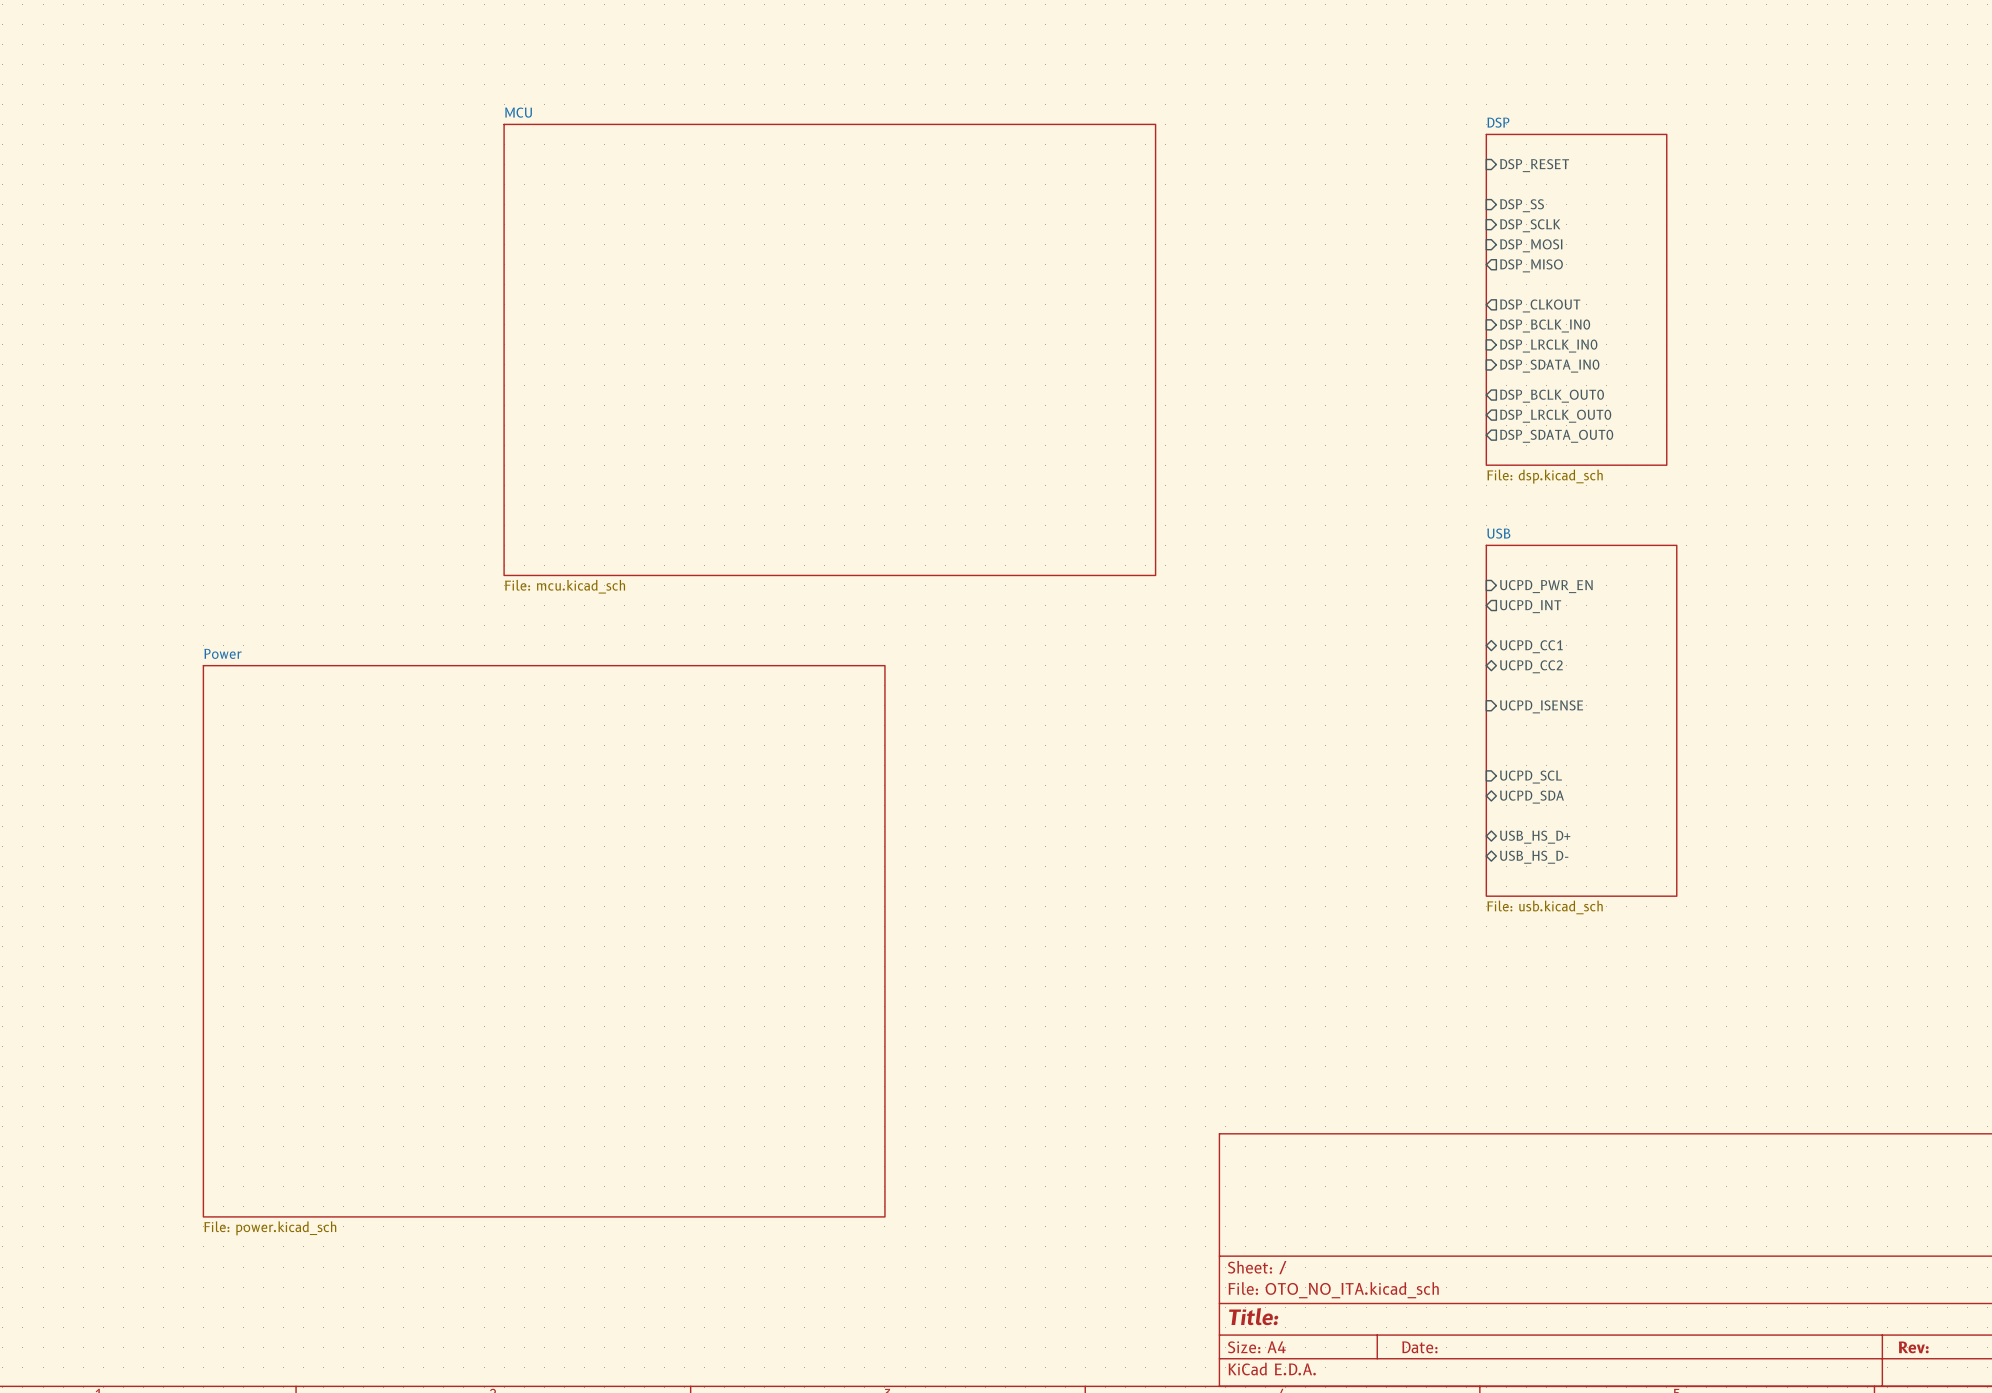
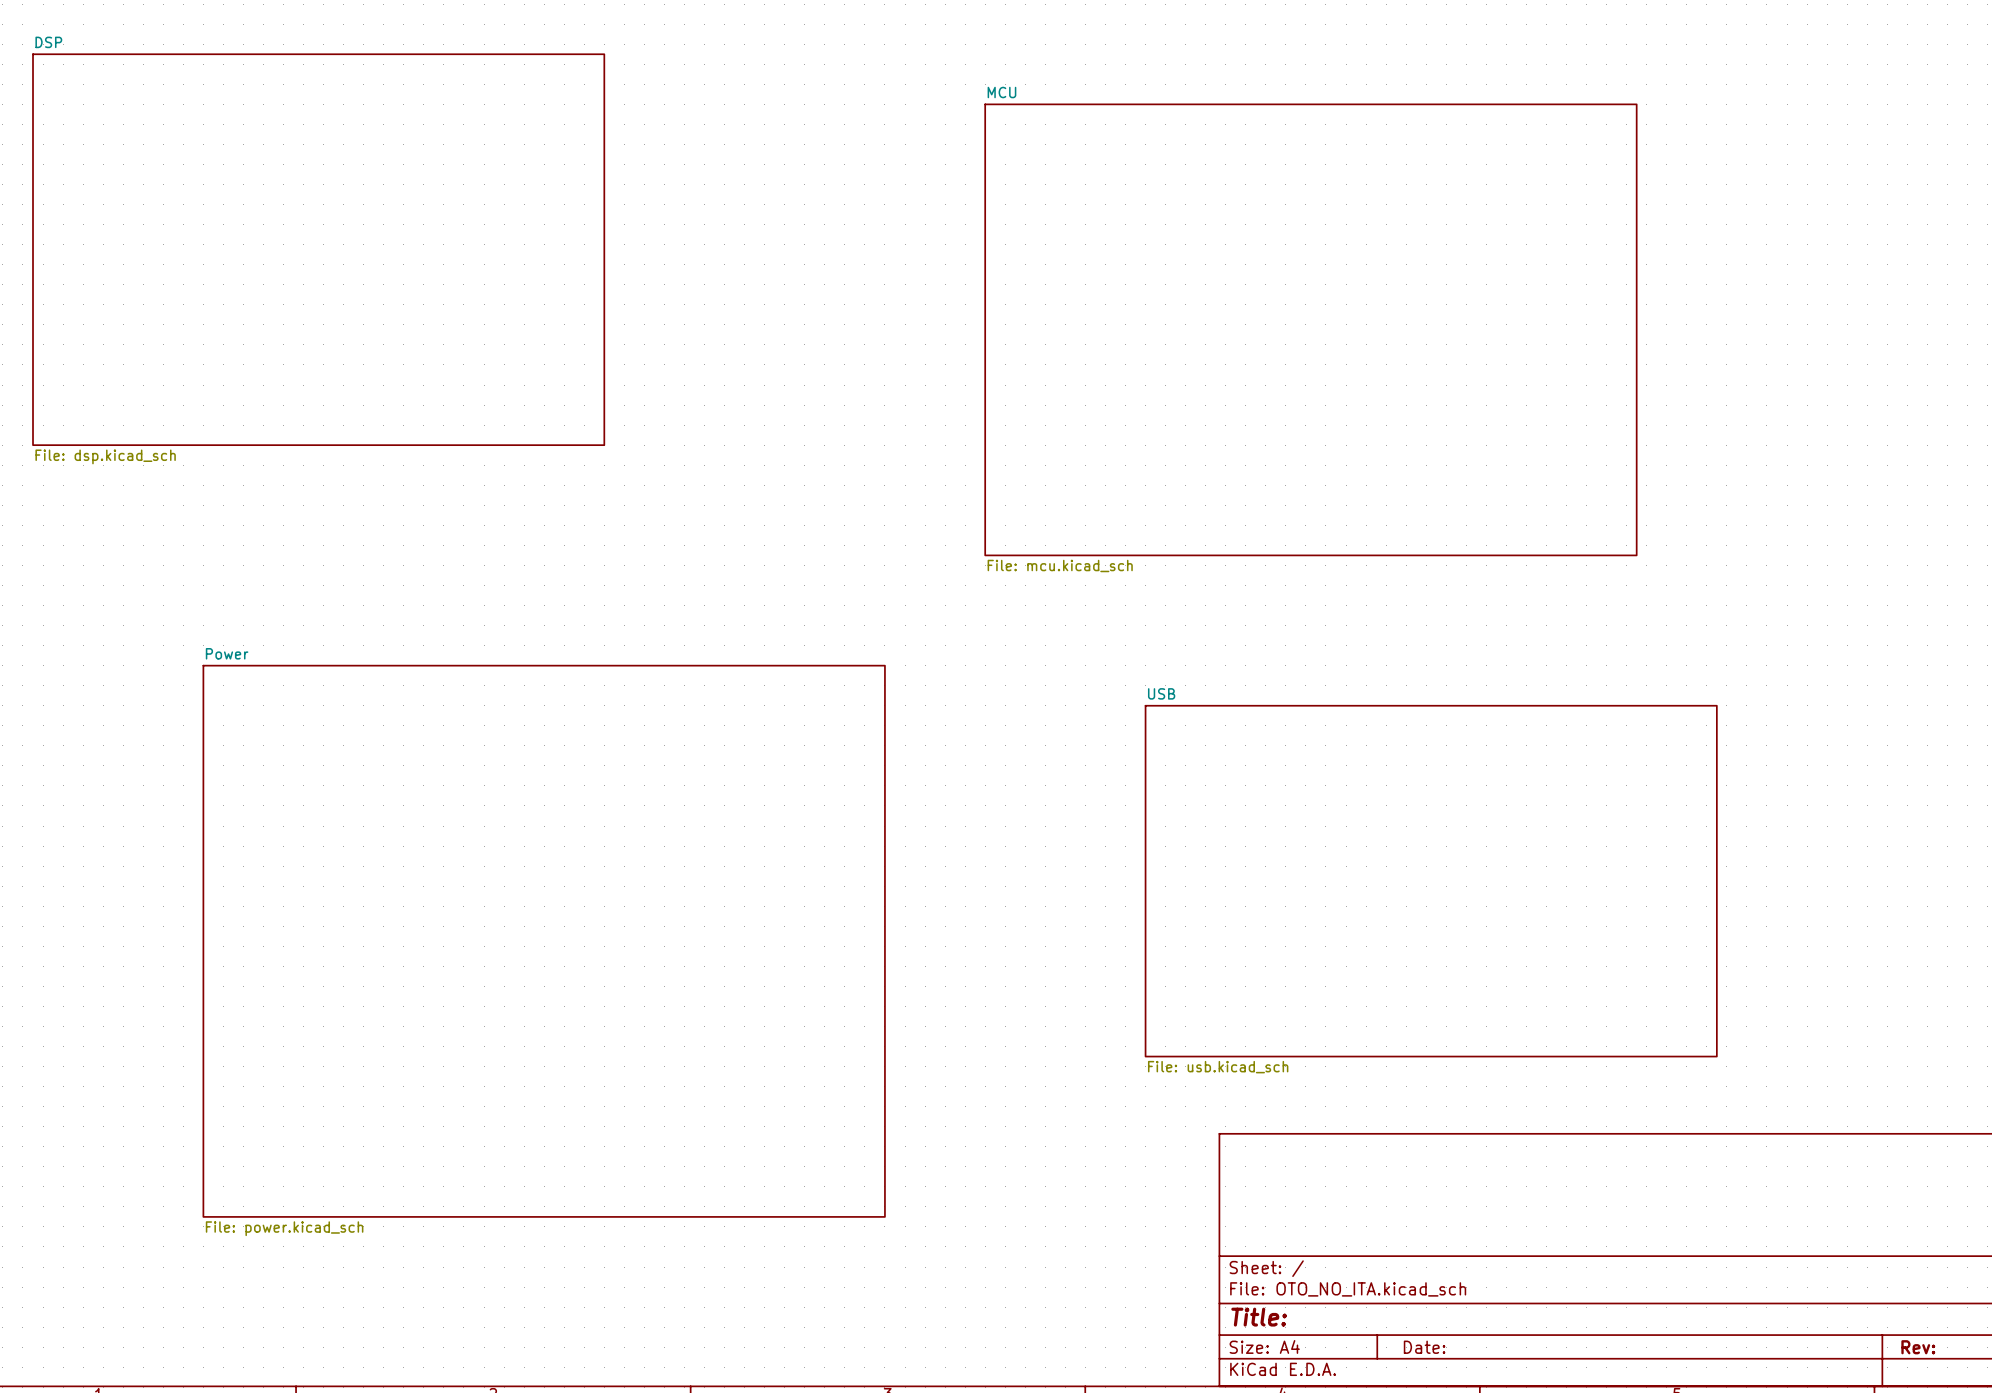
sheet pin: DSP_RESET (1534, 165) -> none
sheet pin: DSP_SS (1522, 205) -> none
sheet pin: DSP_SCLK (1530, 225) -> none
sheet pin: DSP_MOSI (1531, 245) -> none
sheet DSP: none -> File: dsp.kicad_sch (318, 249)
sheet pin: DSP_MISO (1531, 265) -> none
sheet DSP: File: dsp.kicad_sch (1576, 299) -> none
sheet pin: DSP_CLKOUT (1540, 305) -> none
sheet pin: DSP_BCLK_IN0 (1545, 326) -> none
sheet MCU: none -> File: mcu.kicad_sch (1310, 329)
sheet pin: DSP_LRCLK_IN0 (1548, 346) -> none
sheet MCU: File: mcu.kicad_sch (829, 349) -> none
sheet pin: DSP_SDATA_IN0 (1549, 366) -> none
sheet pin: DSP_BCLK_OUT0 (1552, 396) -> none
sheet pin: DSP_LRCLK_OUT0 (1555, 416) -> none
sheet pin: DSP_SDATA_OUT0 (1556, 436) -> none
sheet pin: UCPD_PWR_EN (1546, 586) -> none
sheet pin: UCPD_INT (1530, 606) -> none
sheet pin: UCPD_CC1 (1531, 646) -> none
sheet pin: UCPD_CC2 (1531, 666) -> none
sheet pin: UCPD_ISENSE (1541, 706) -> none
sheet USB: File: usb.kicad_sch (1581, 720) -> none
sheet pin: UCPD_SCL (1531, 777) -> none
sheet pin: UCPD_SDA (1531, 797) -> none
sheet pin: USB_HS_D+ (1535, 837) -> none
sheet pin: USB_HS_D- (1534, 857) -> none
sheet USB: none -> File: usb.kicad_sch (1431, 881)

